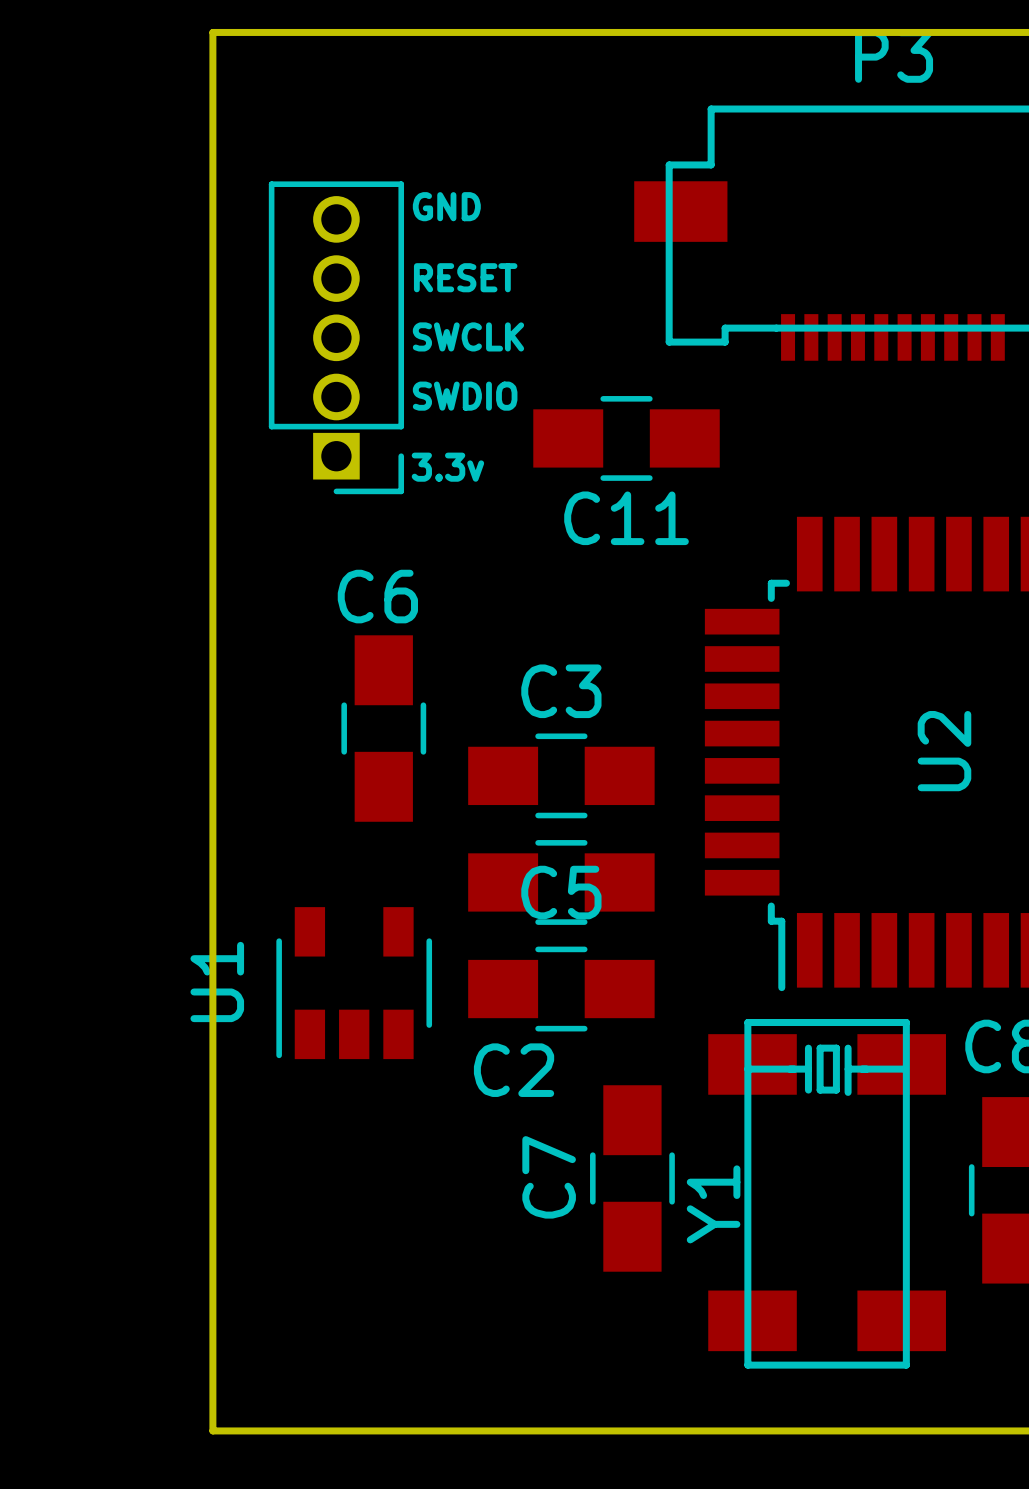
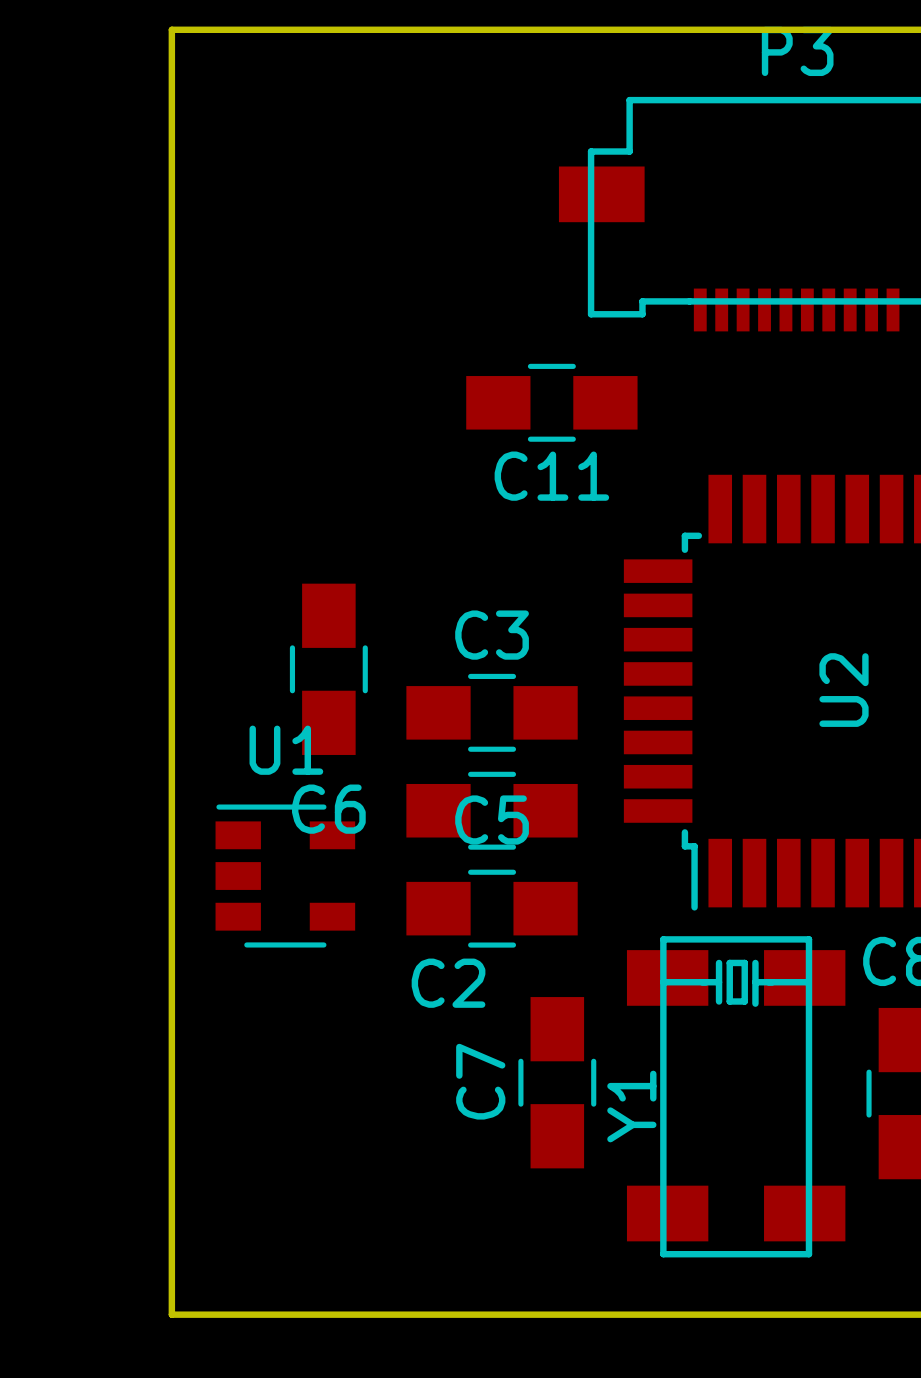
text: GND (446, 206) -> none
text: RESET (465, 277) -> none
text: SWCLK (468, 336) -> none
part: (336, 337) -> none
text: SWDIO (465, 396) -> none
text: 3.3v (447, 467) -> none
C6 name position: C6 (377, 596) -> C6 (328, 809)
U1 rotation: 0° (354, 983) -> 90° clockwise (285, 876)

